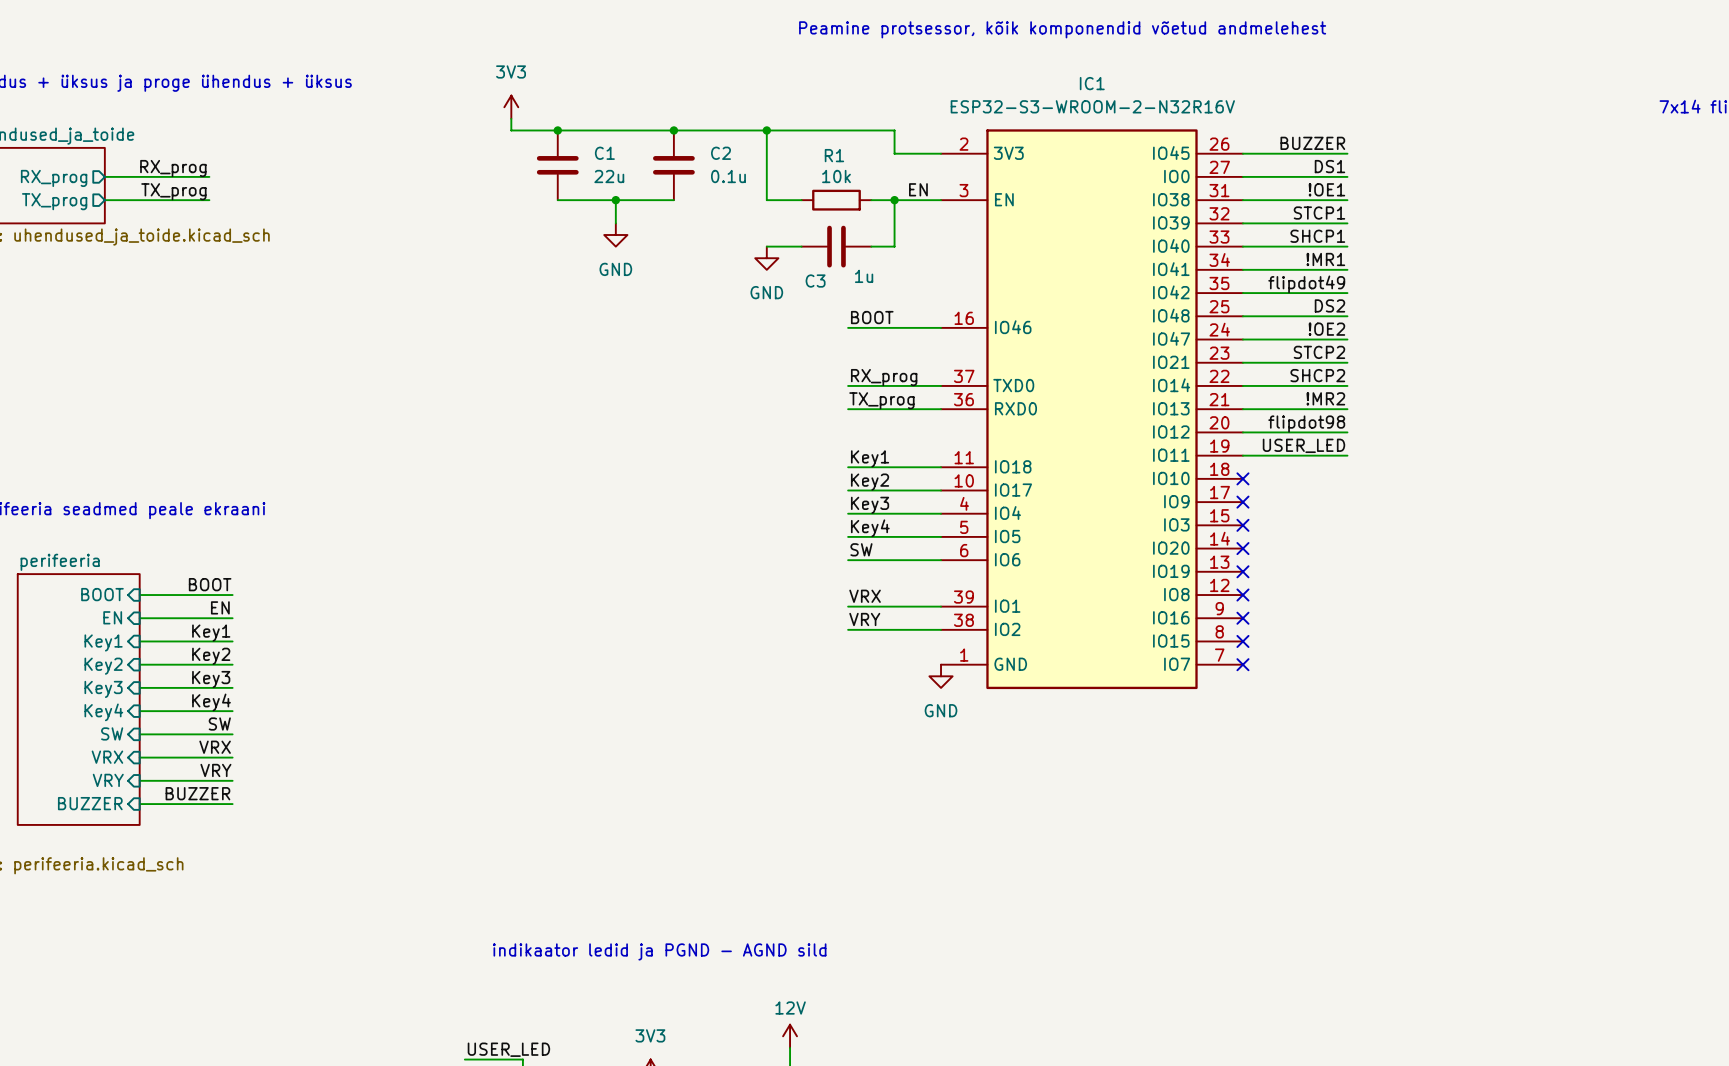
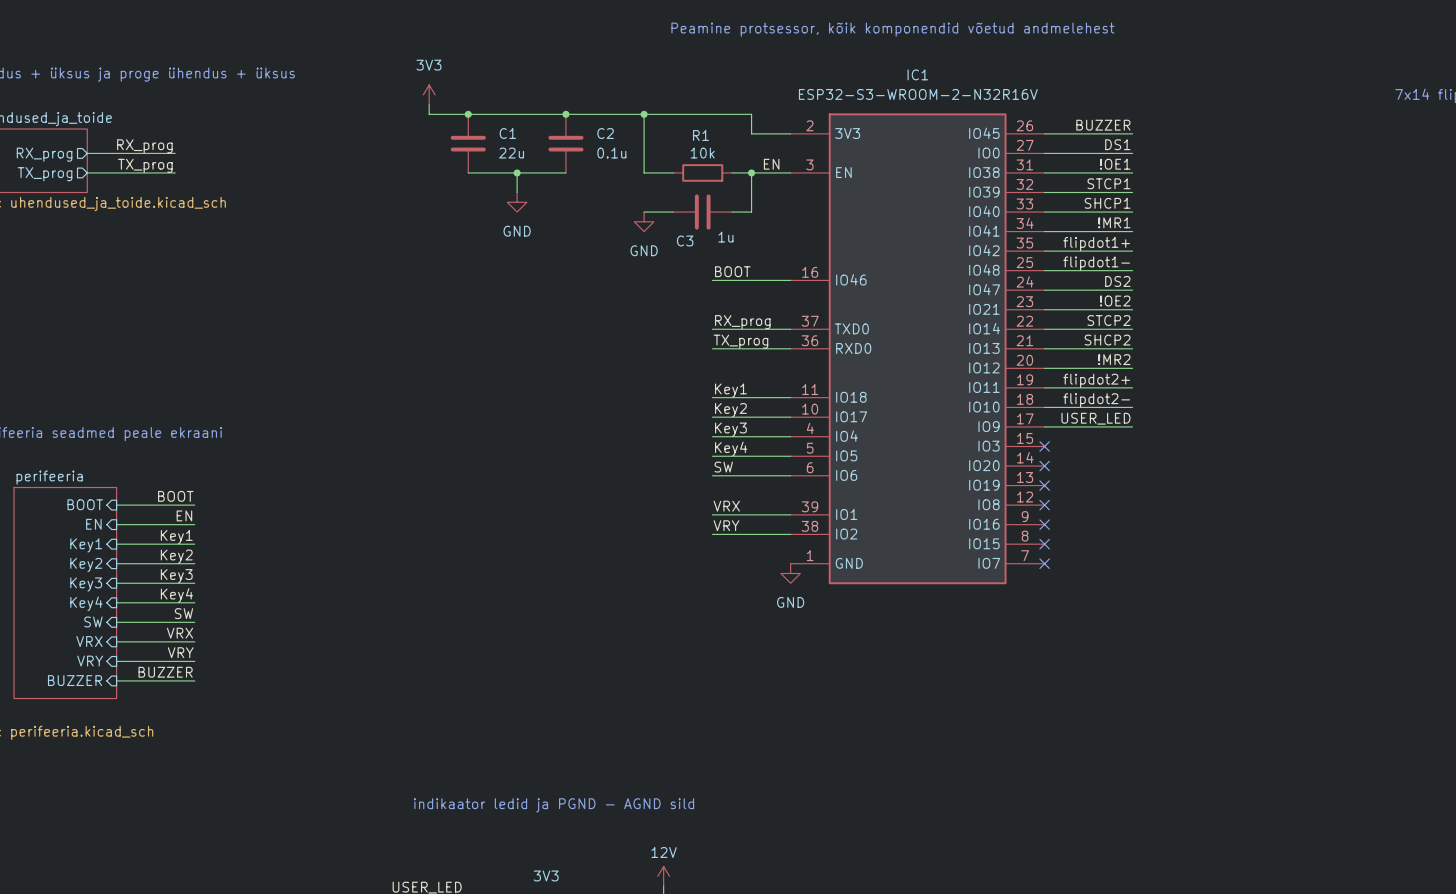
label: flipdot49 (1306, 284) -> flipdot1+ (1096, 244)
label: DS2 (1329, 305) -> flipdot1- (1096, 263)
label: !OE2 (1326, 329) -> DS2 (1117, 281)
label: STCP2 (1319, 352) -> !OE2 (1115, 301)
label: SHCP2 (1317, 375) -> STCP2 (1108, 320)
label: !MR2 (1325, 398) -> SHCP2 (1107, 340)
label: flipdot98 (1306, 424) -> !MR2 (1114, 359)
label: USER_LED (1303, 445) -> flipdot2+ (1096, 380)
label: none -> flipdot2- (1096, 400)
wire: none -> (1044, 407) (1132, 407)
no-connect mark: (1242, 478) -> none
label: none -> USER_LED (1095, 418)
wire: none -> (1044, 426) (1132, 426)
no-connect mark: (1242, 502) -> none

